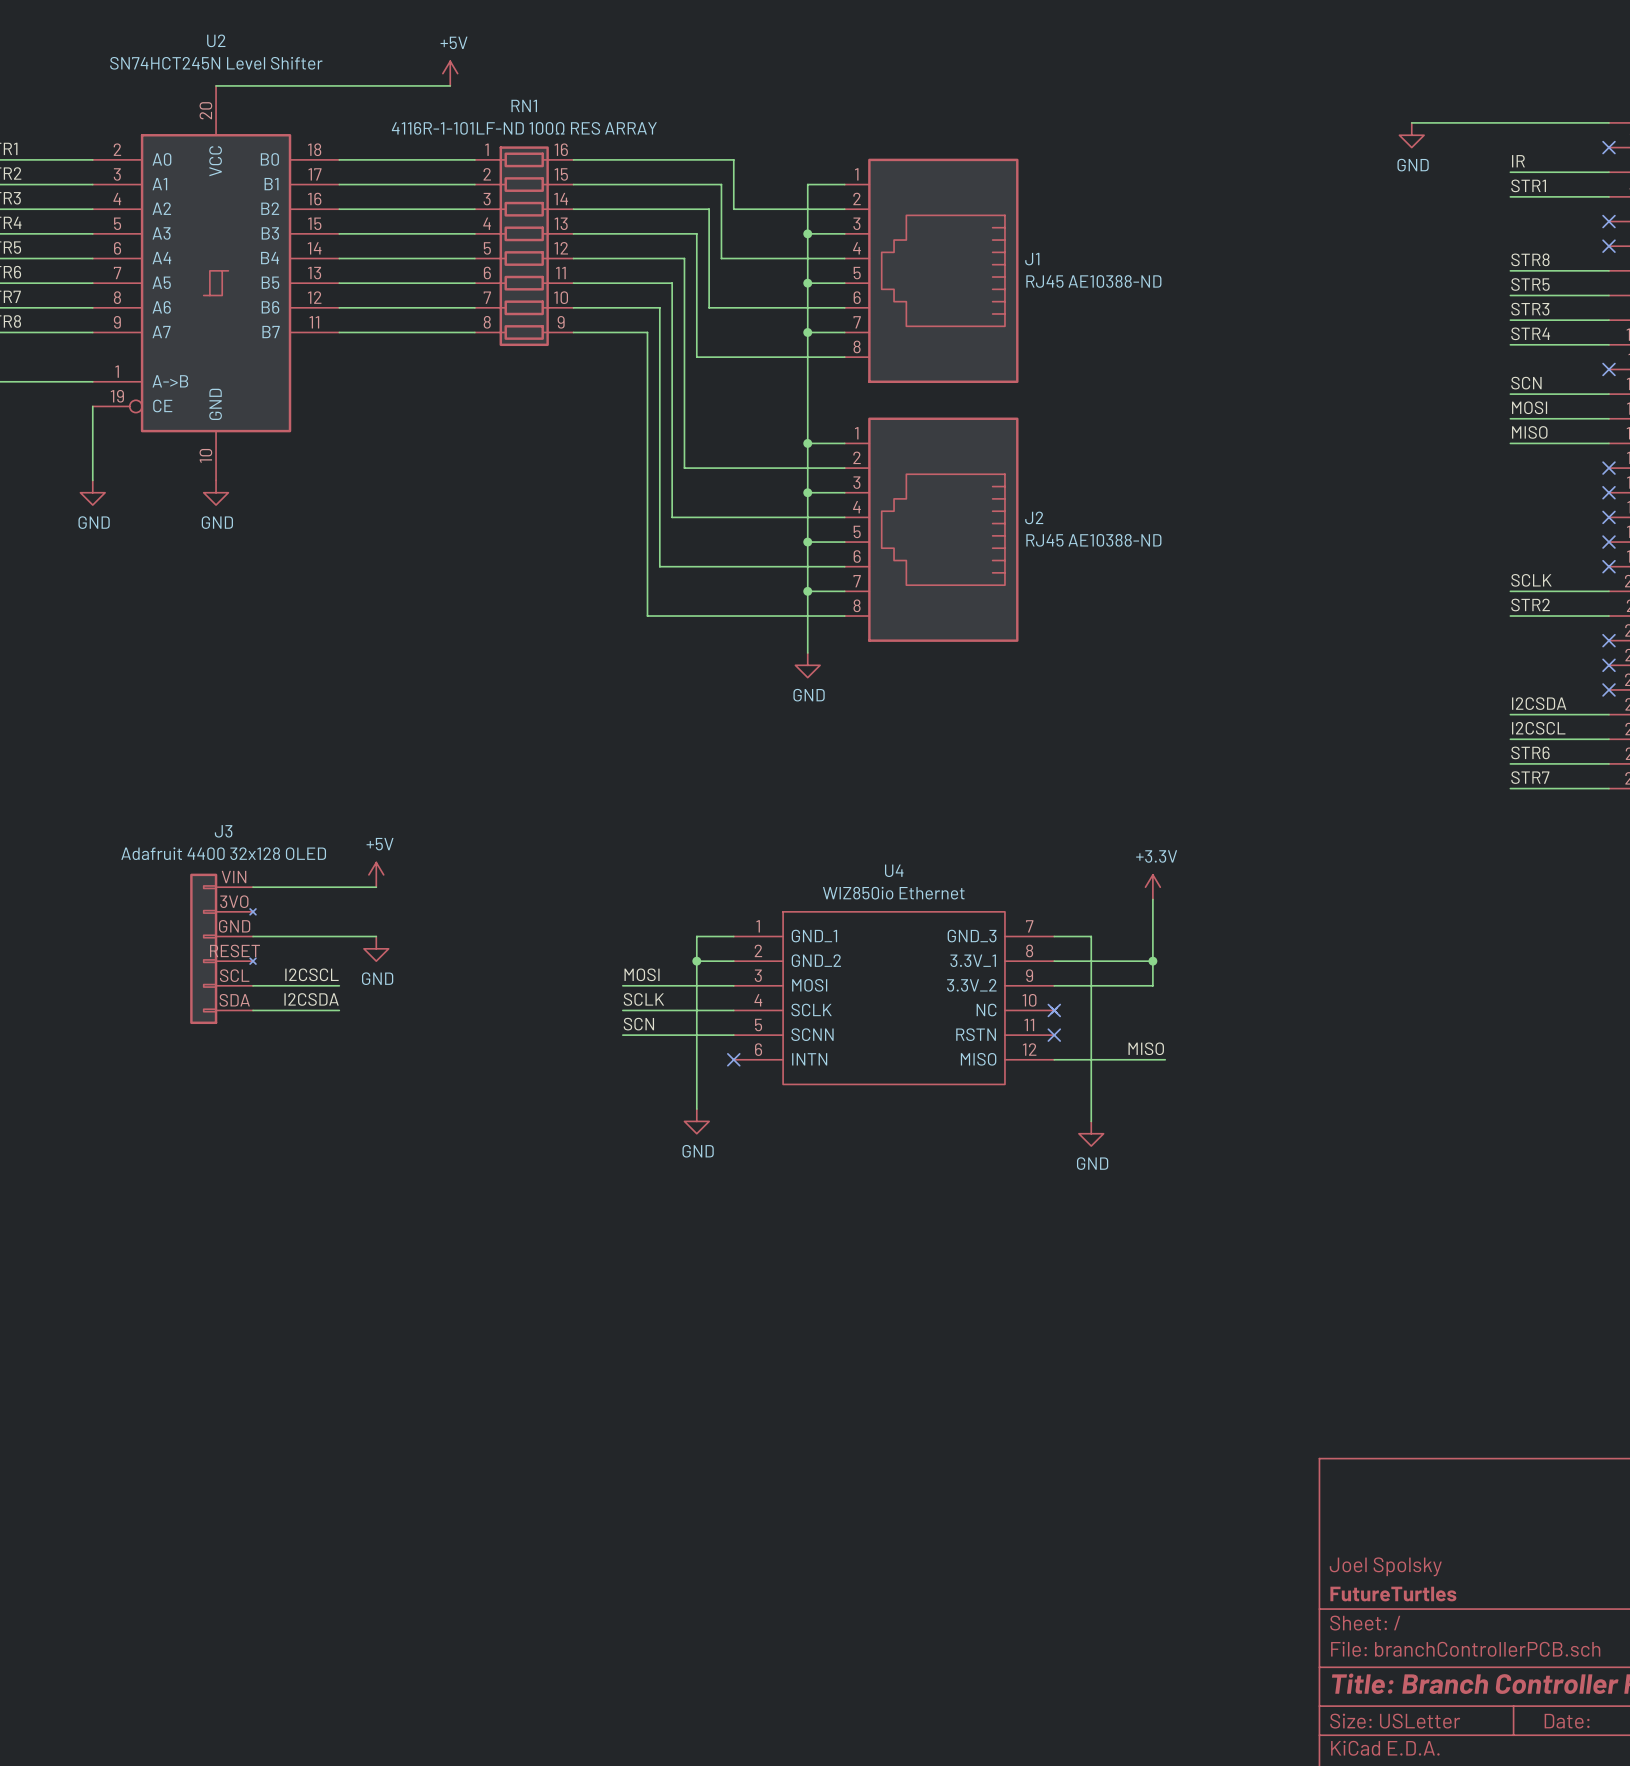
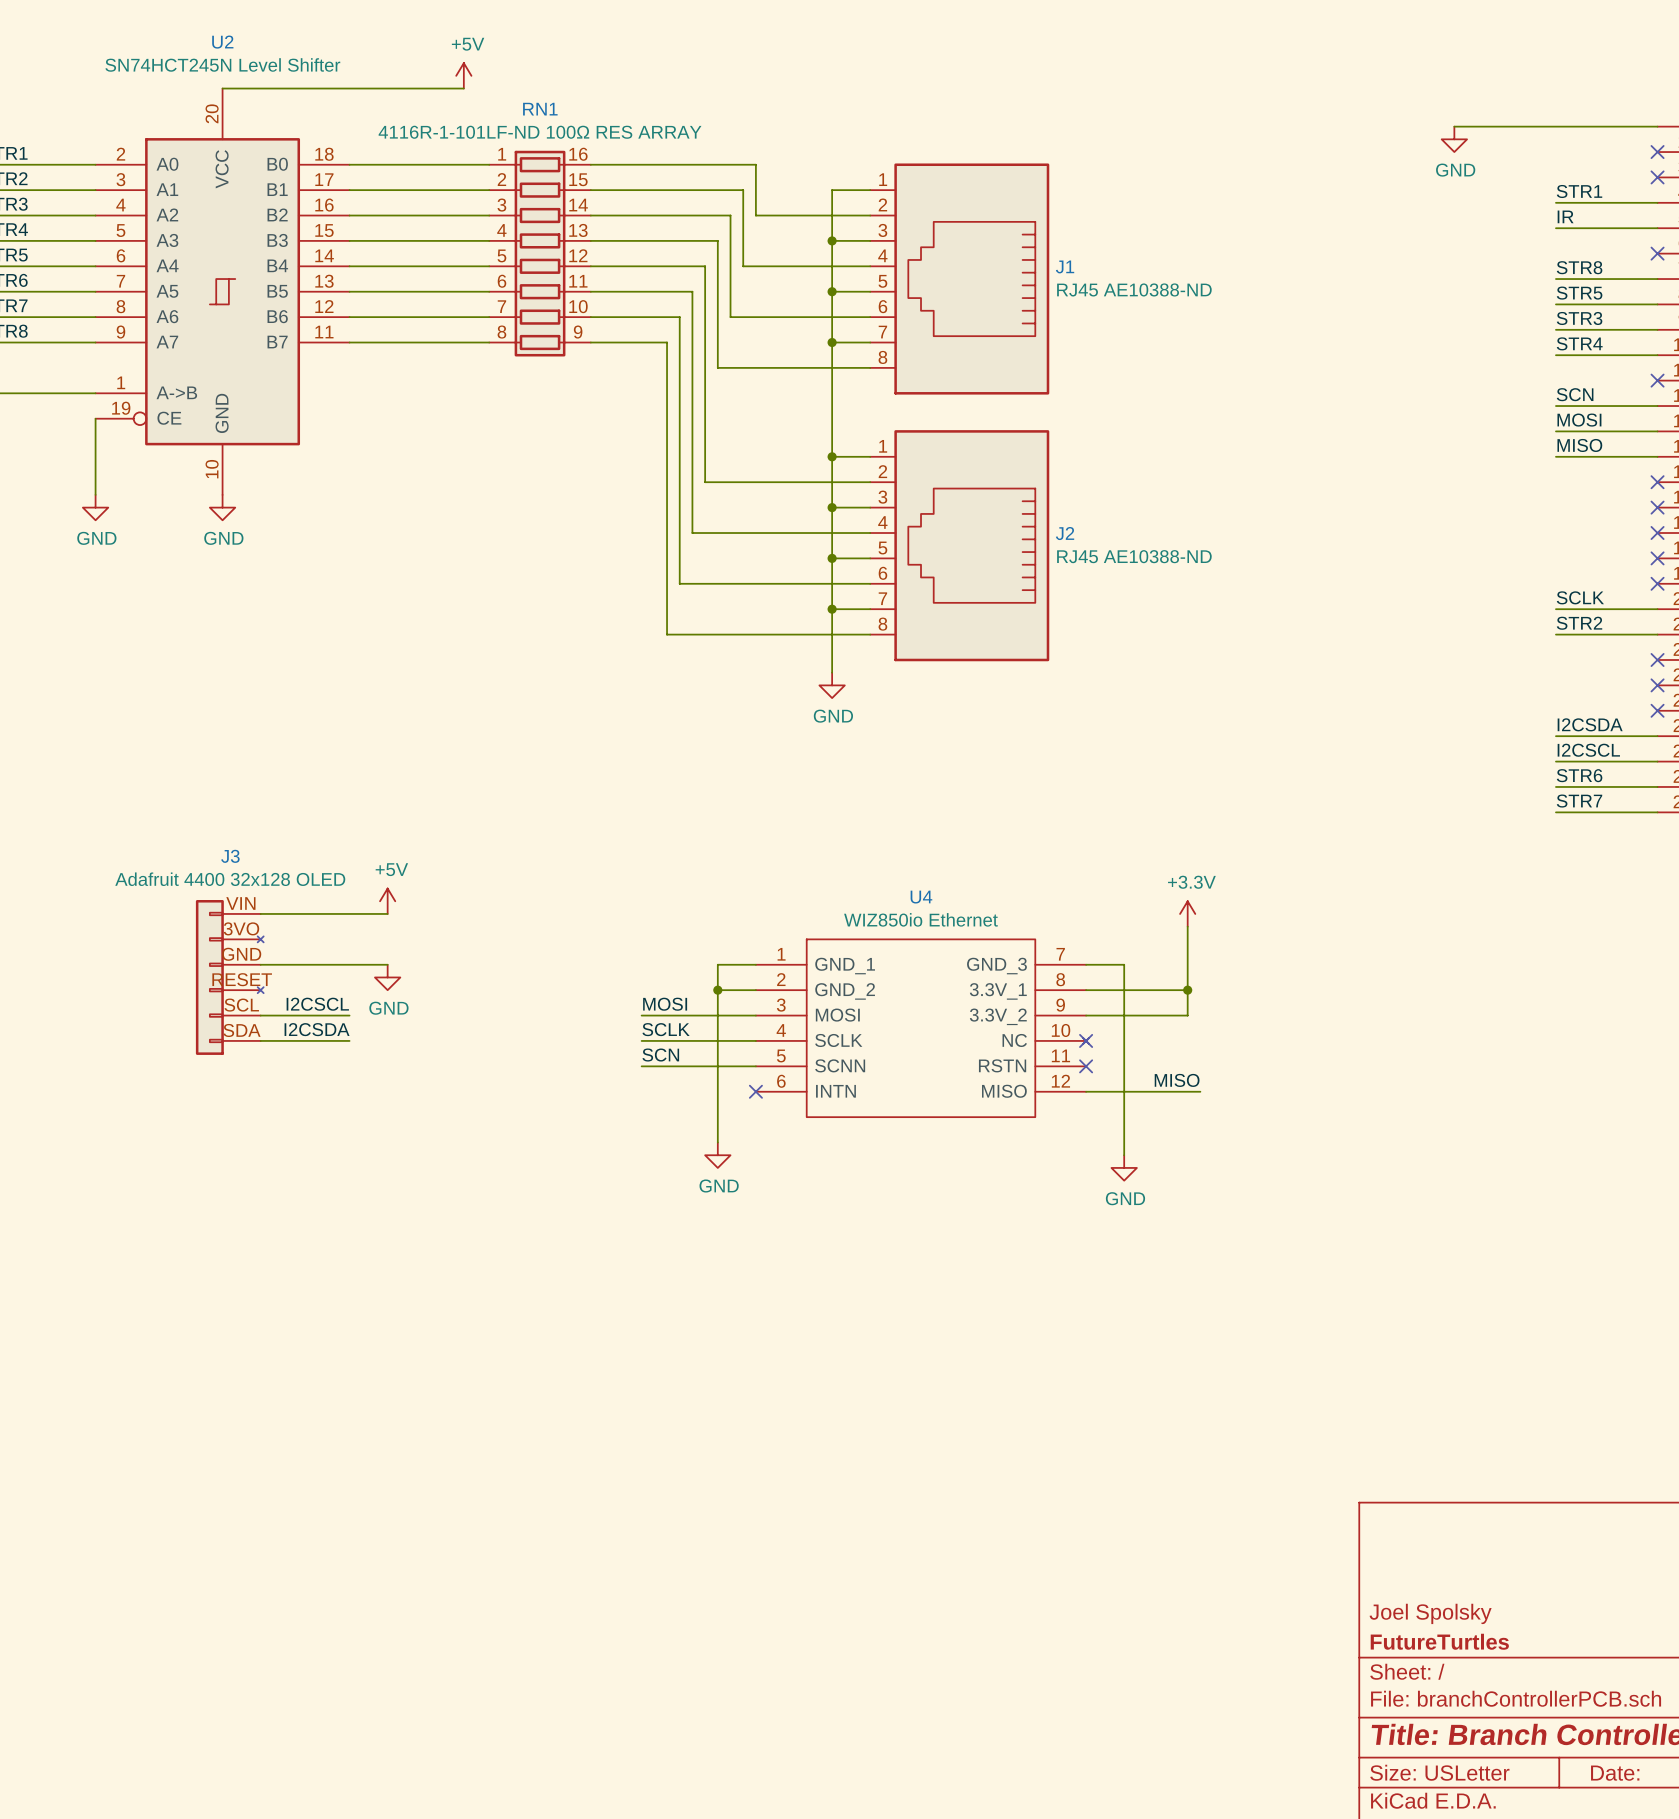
label position: IR (1518, 161) -> IR (1565, 216)
wire: (1510, 172) (1608, 172) -> (1555, 228) (1657, 228)
no-connect mark position: (1608, 221) -> (1657, 177)

